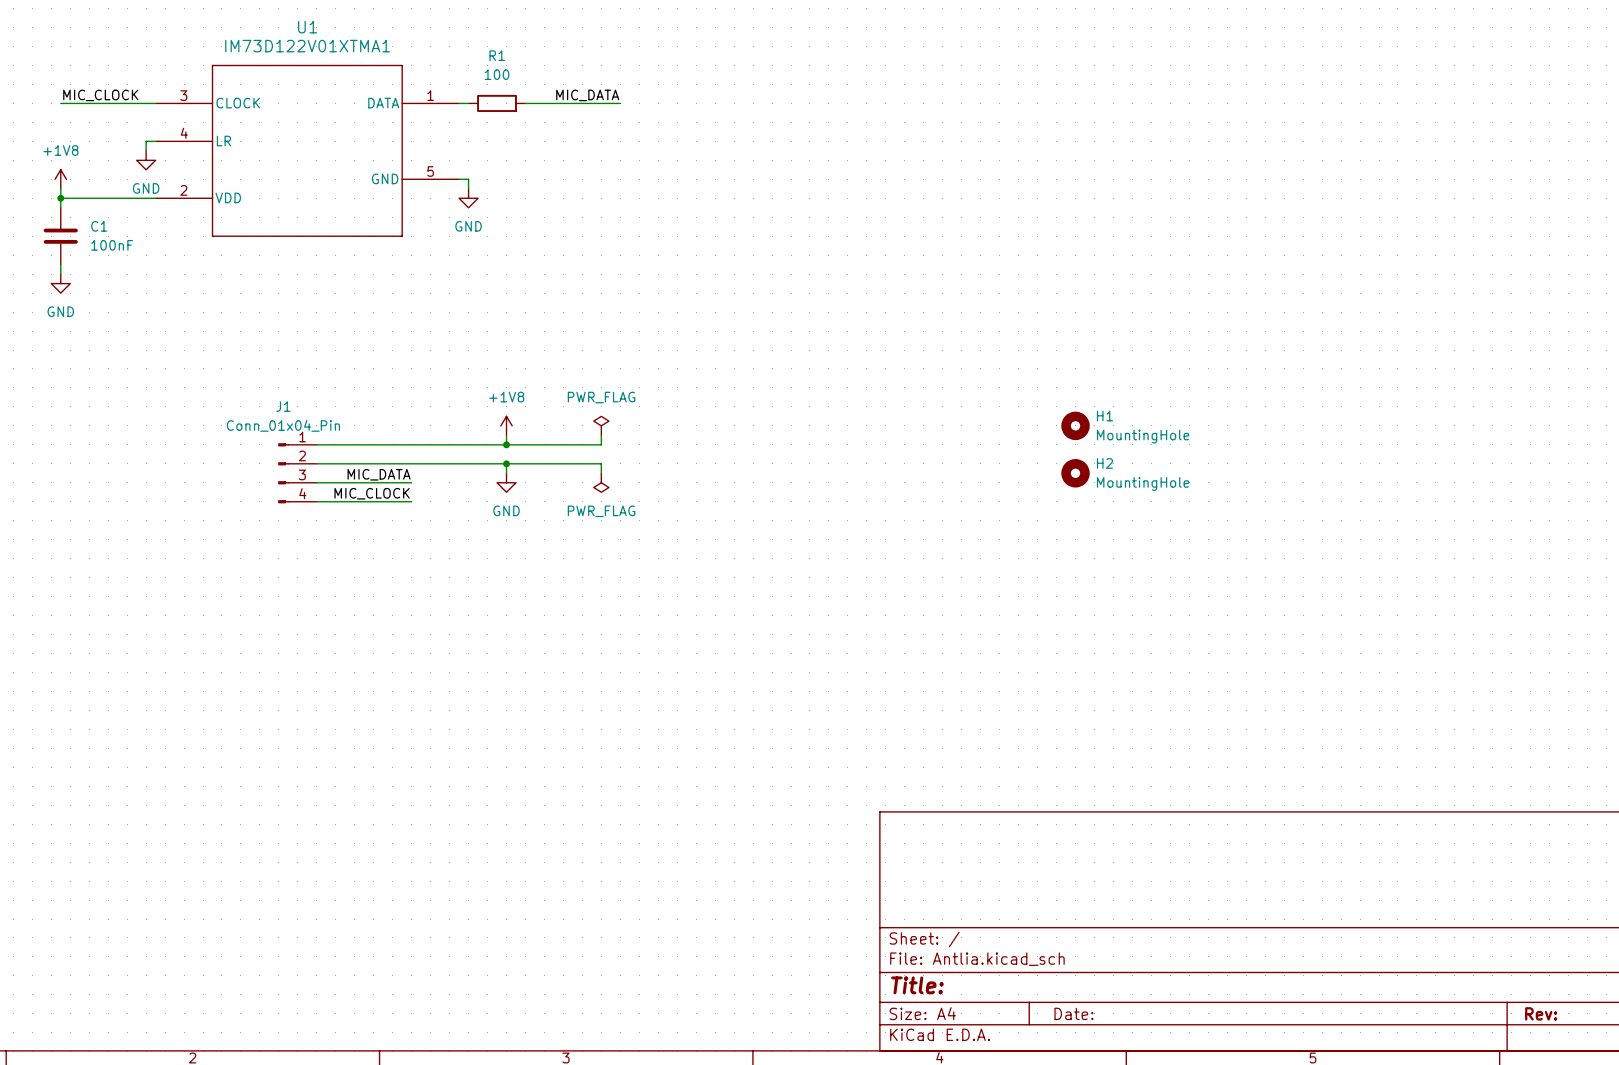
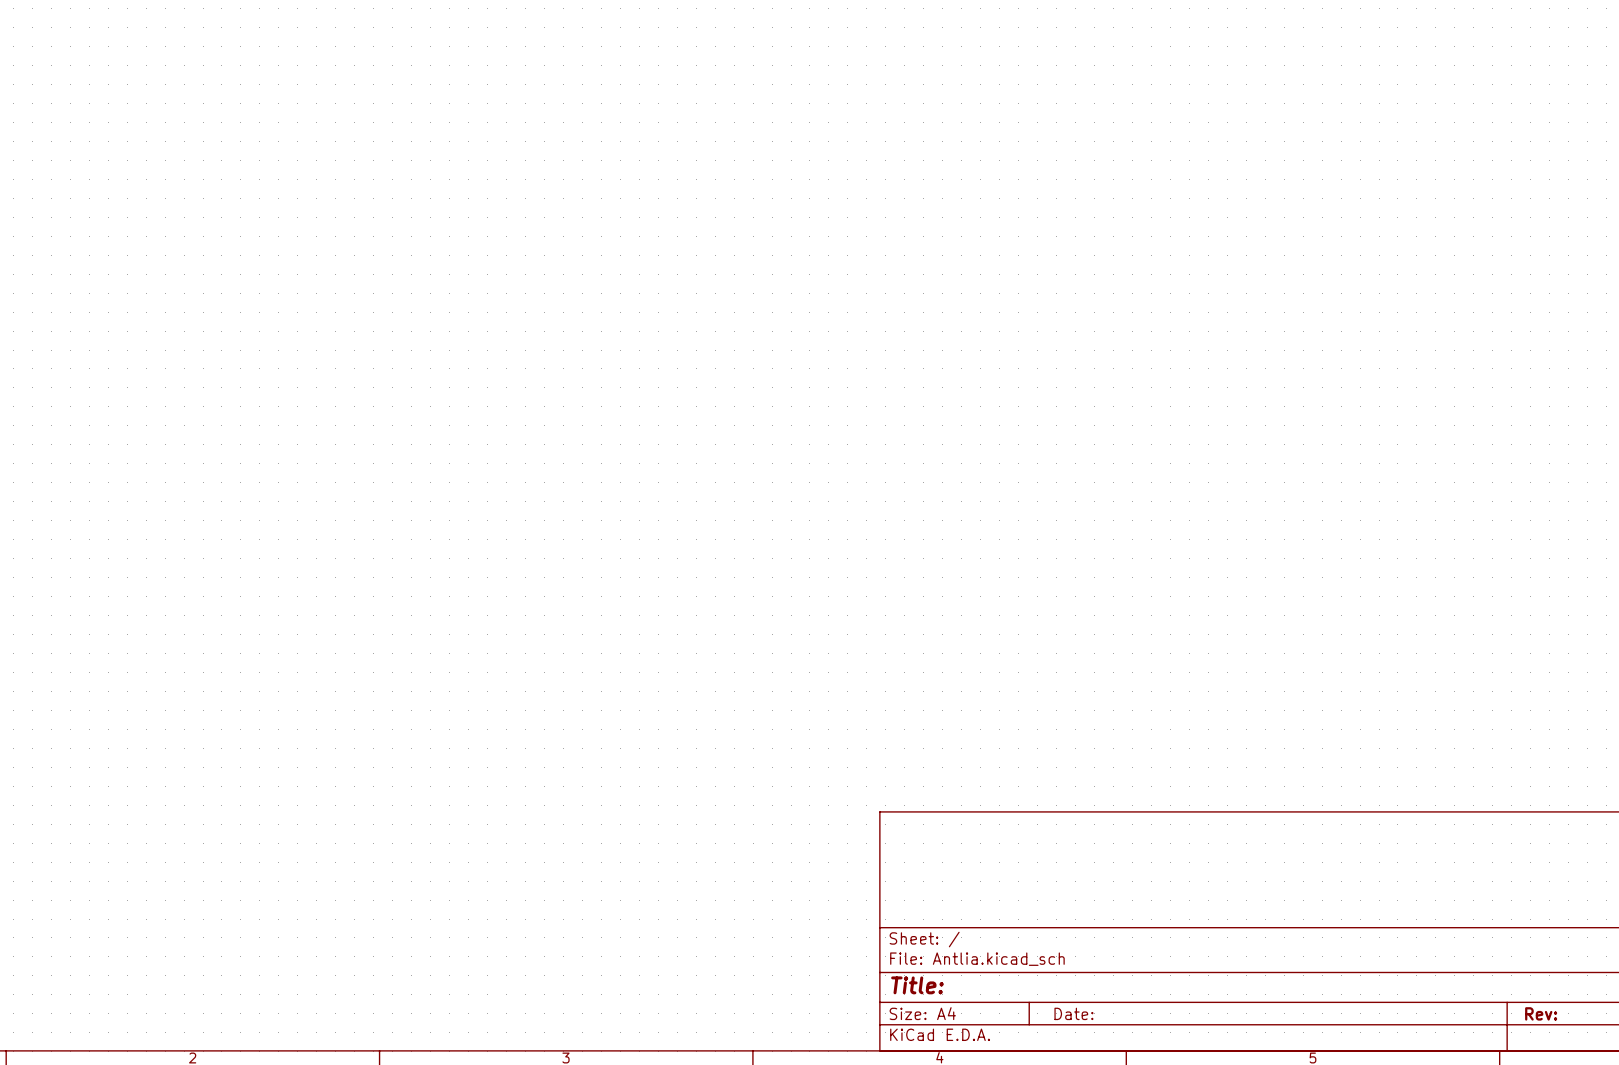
label: MIC_CLOCK (100, 95) -> none
label: MIC_DATA (587, 95) -> none
wire: (60, 103) (155, 103) -> none
wire: (459, 103) (468, 103) -> none
R1: 100 (497, 103) -> none
wire: (525, 103) (620, 103) -> none
wire: (155, 141) (146, 141) (146, 150) -> none
U1: IM73D122V01XTMA1 (307, 150) -> none
power symbol: GND (146, 160) -> none
power symbol: +1V8 (60, 179) -> none
wire: (459, 179) (468, 179) (468, 188) -> none
wire: (60, 188) (60, 207) -> none
wire: (60, 198) (155, 198) -> none
junction: (60, 198) -> none
power symbol: GND (468, 198) -> none
C1: 100nF (60, 236) -> none
wire: (60, 264) (60, 274) -> none
power symbol: GND (60, 283) -> none
power symbol: +1V8 (506, 425) -> none
power symbol: PWR_FLAG (601, 425) -> none
H1: MountingHole (1075, 425) -> none
wire: (506, 435) (506, 444) -> none
wire: (601, 435) (601, 444) (316, 444) -> none
junction: (506, 444) -> none
wire: (316, 463) (601, 463) (601, 473) -> none
wire: (506, 463) (506, 473) -> none
junction: (506, 463) -> none
J1: Conn_01x04_Pin (297, 473) -> none
H2: MountingHole (1075, 473) -> none
label: MIC_DATA (379, 474) -> none
wire: (316, 482) (411, 482) -> none
power symbol: GND (506, 482) -> none
power symbol: PWR_FLAG (601, 482) -> none
label: MIC_CLOCK (372, 493) -> none
wire: (316, 501) (411, 501) -> none

